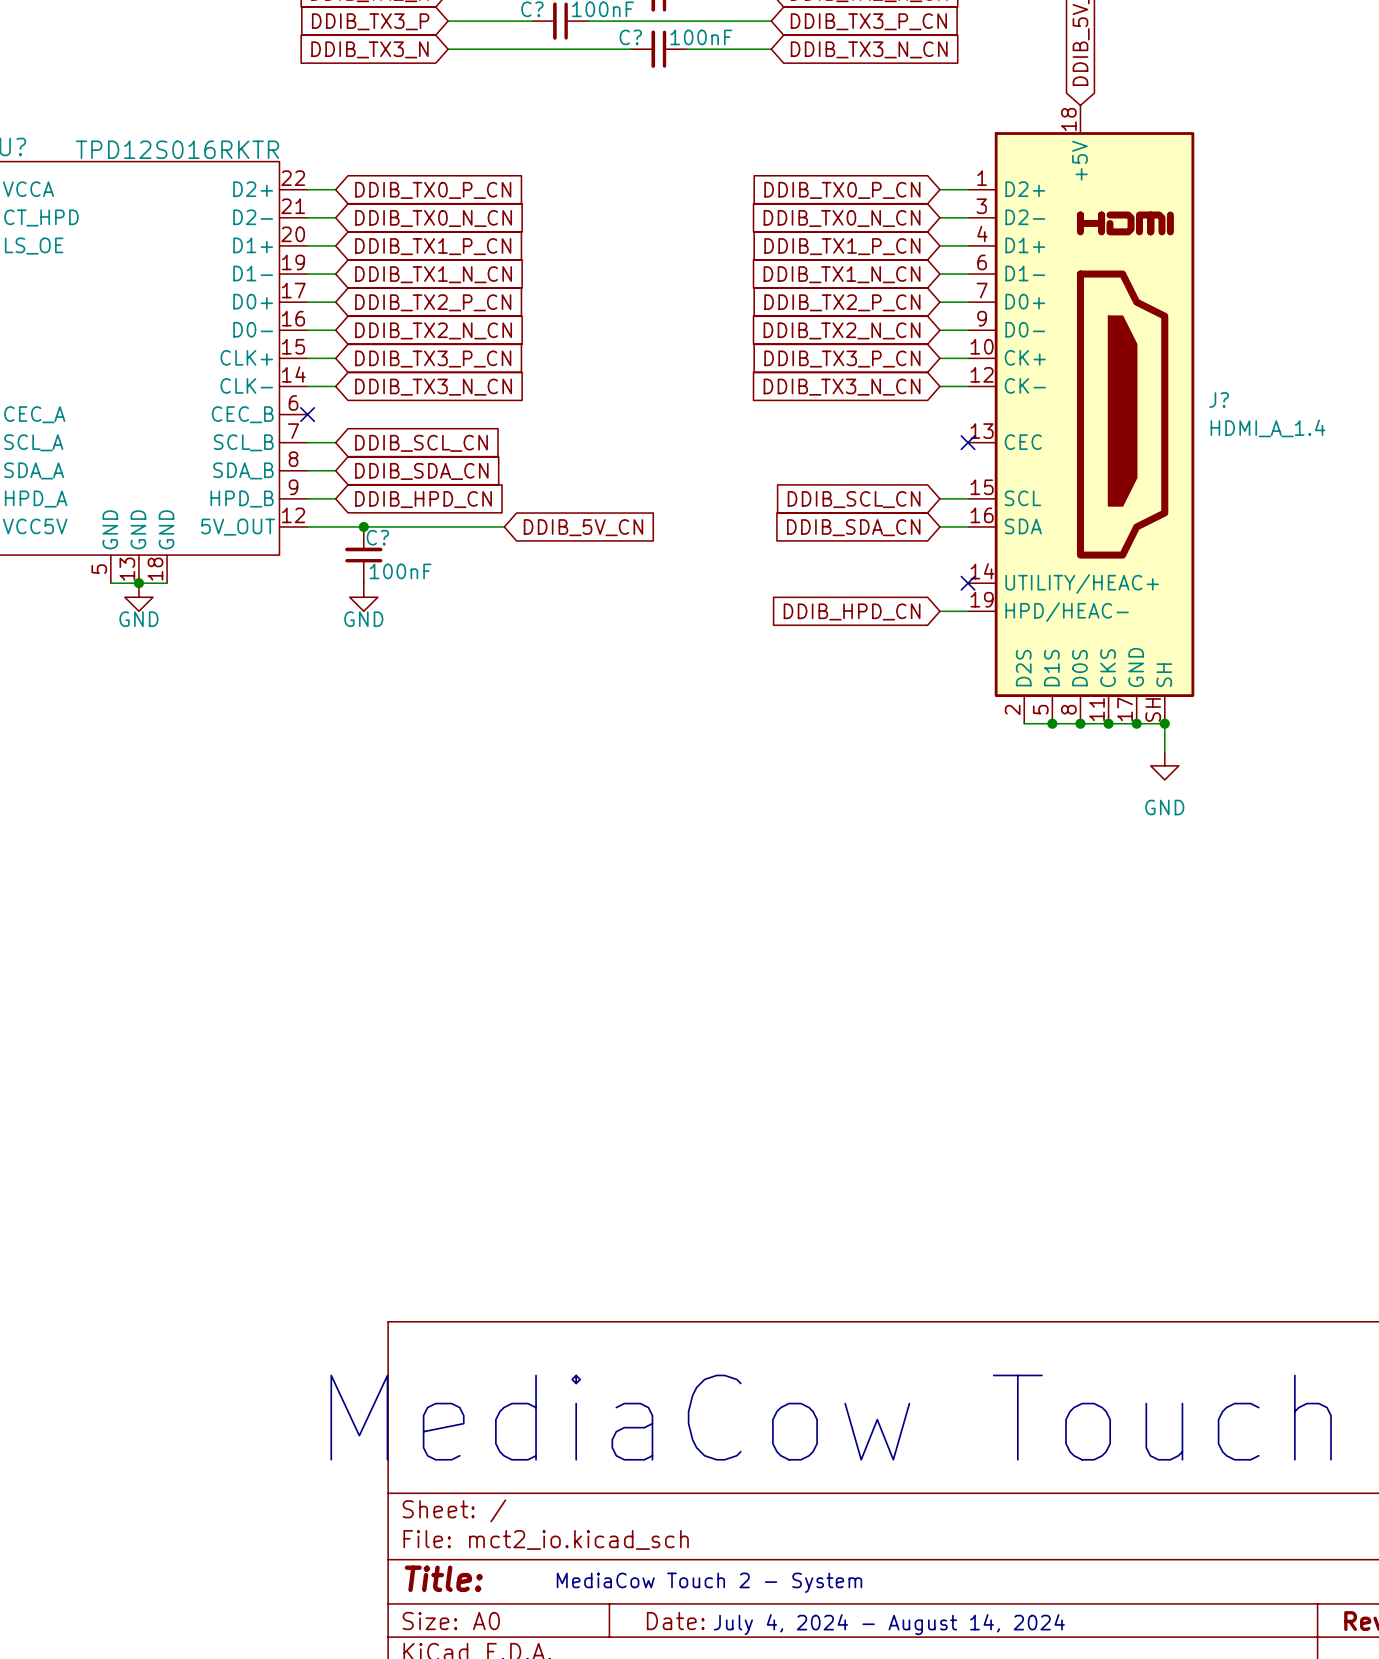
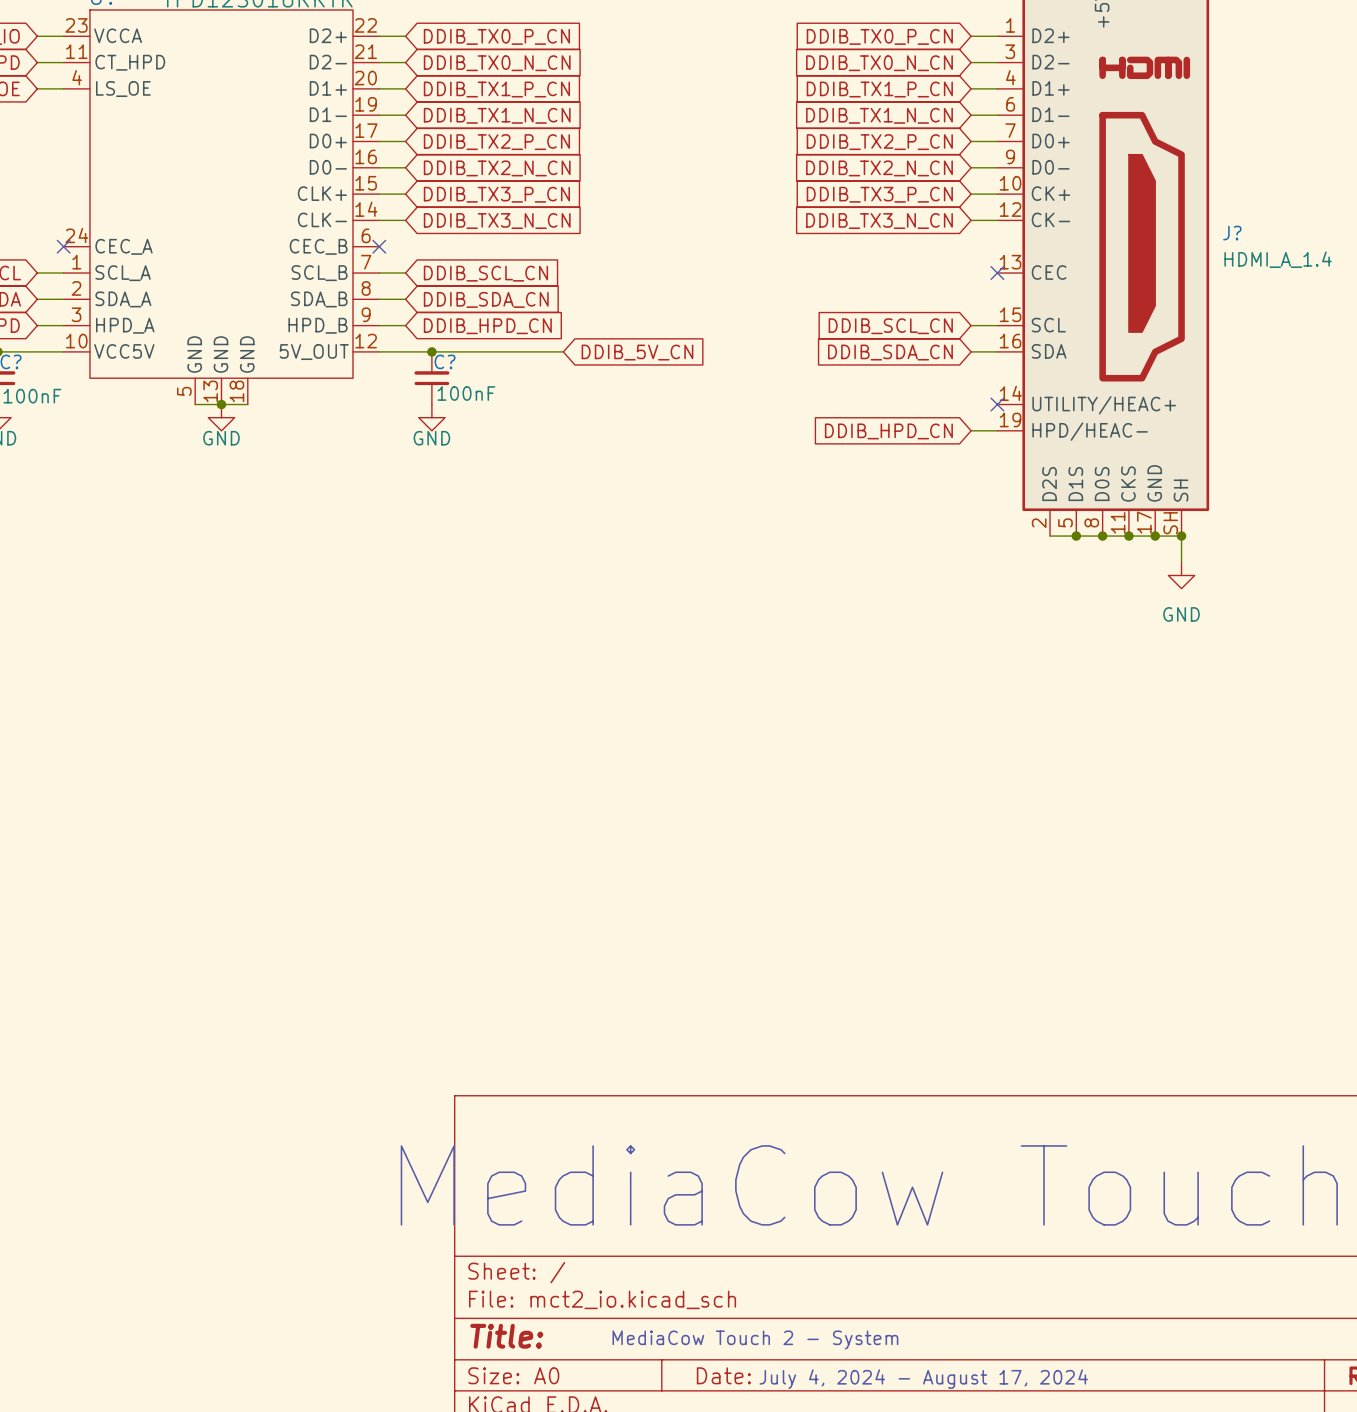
text: July 4, 2024 - August 14, 2024 (889, 1624) -> July 4, 2024 - August 17, 2024 (923, 1379)

